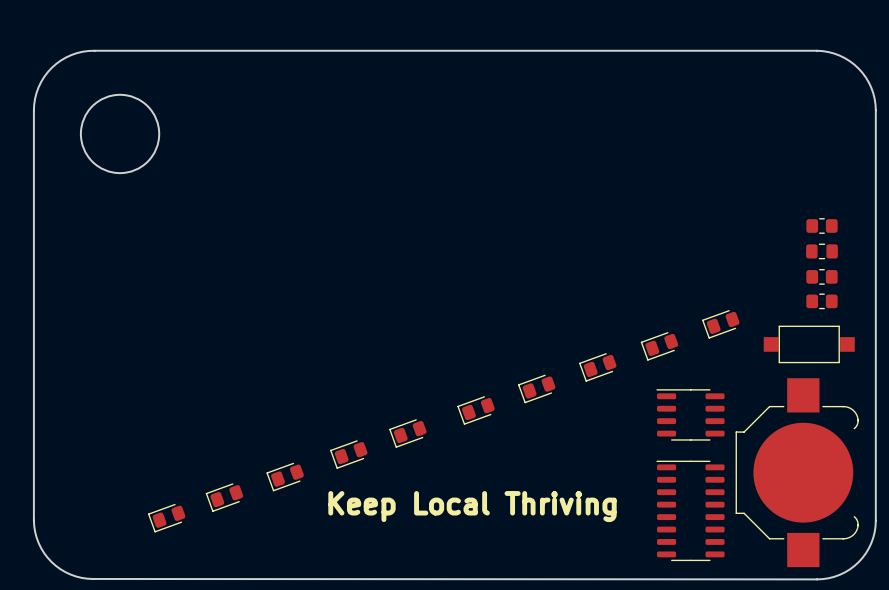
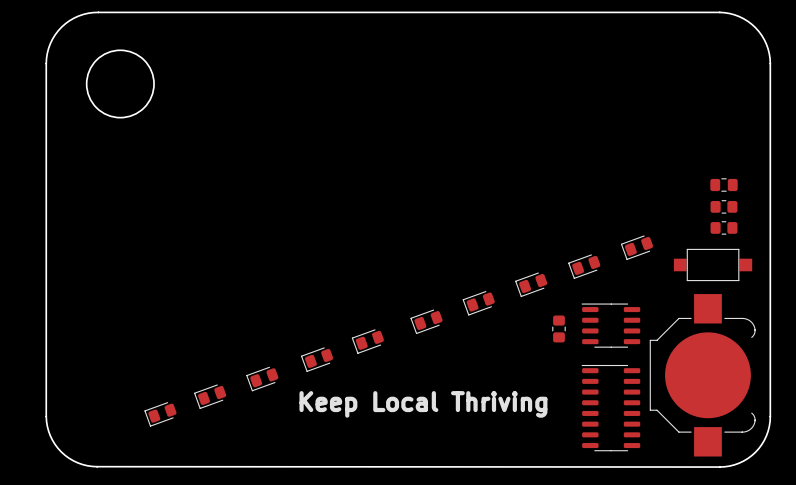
part: (821, 225) -> none
part: none -> (558, 328)

